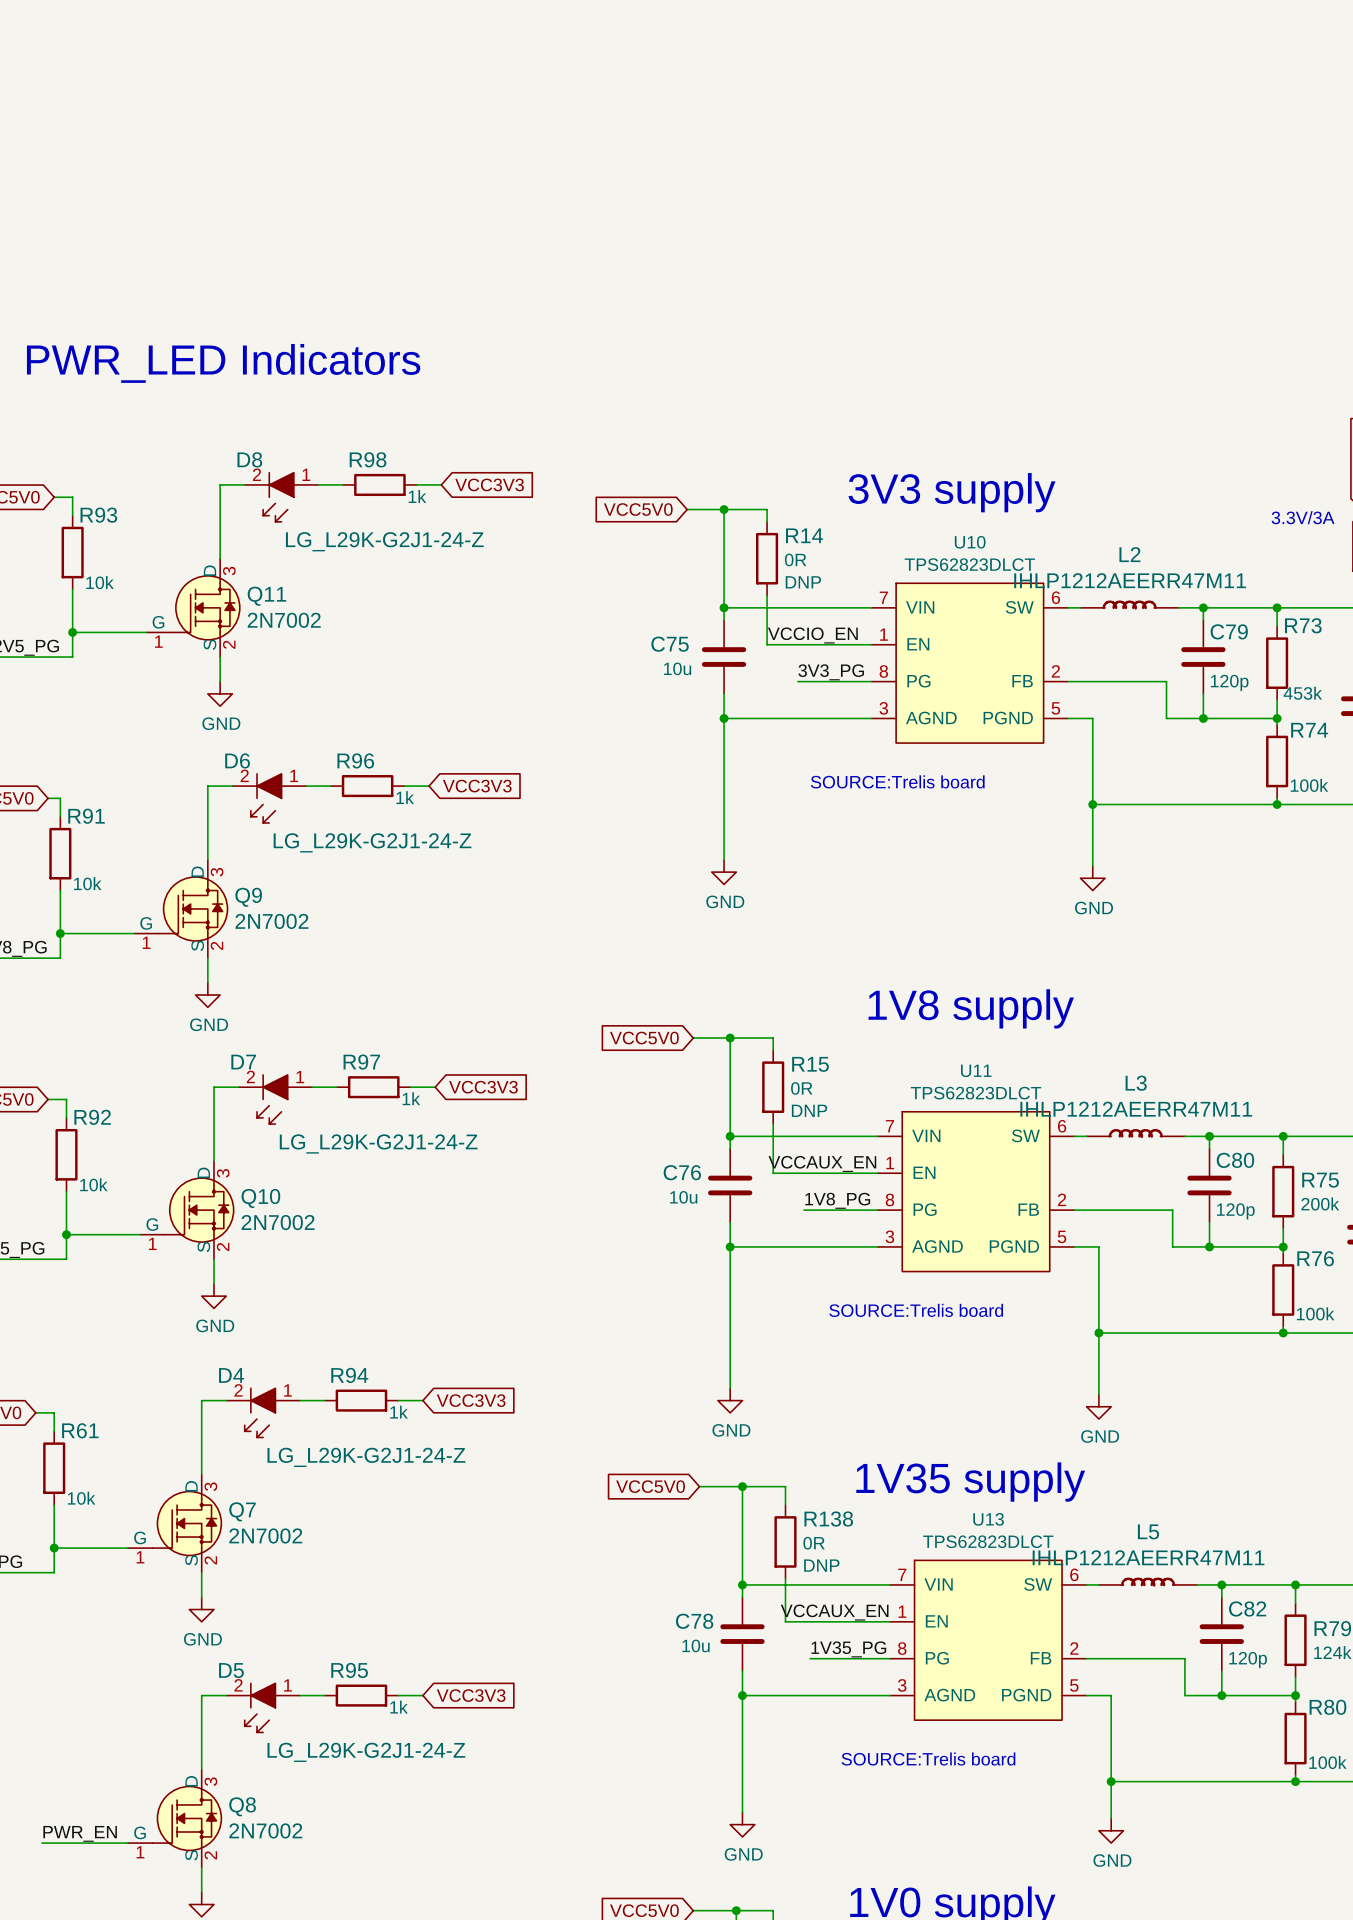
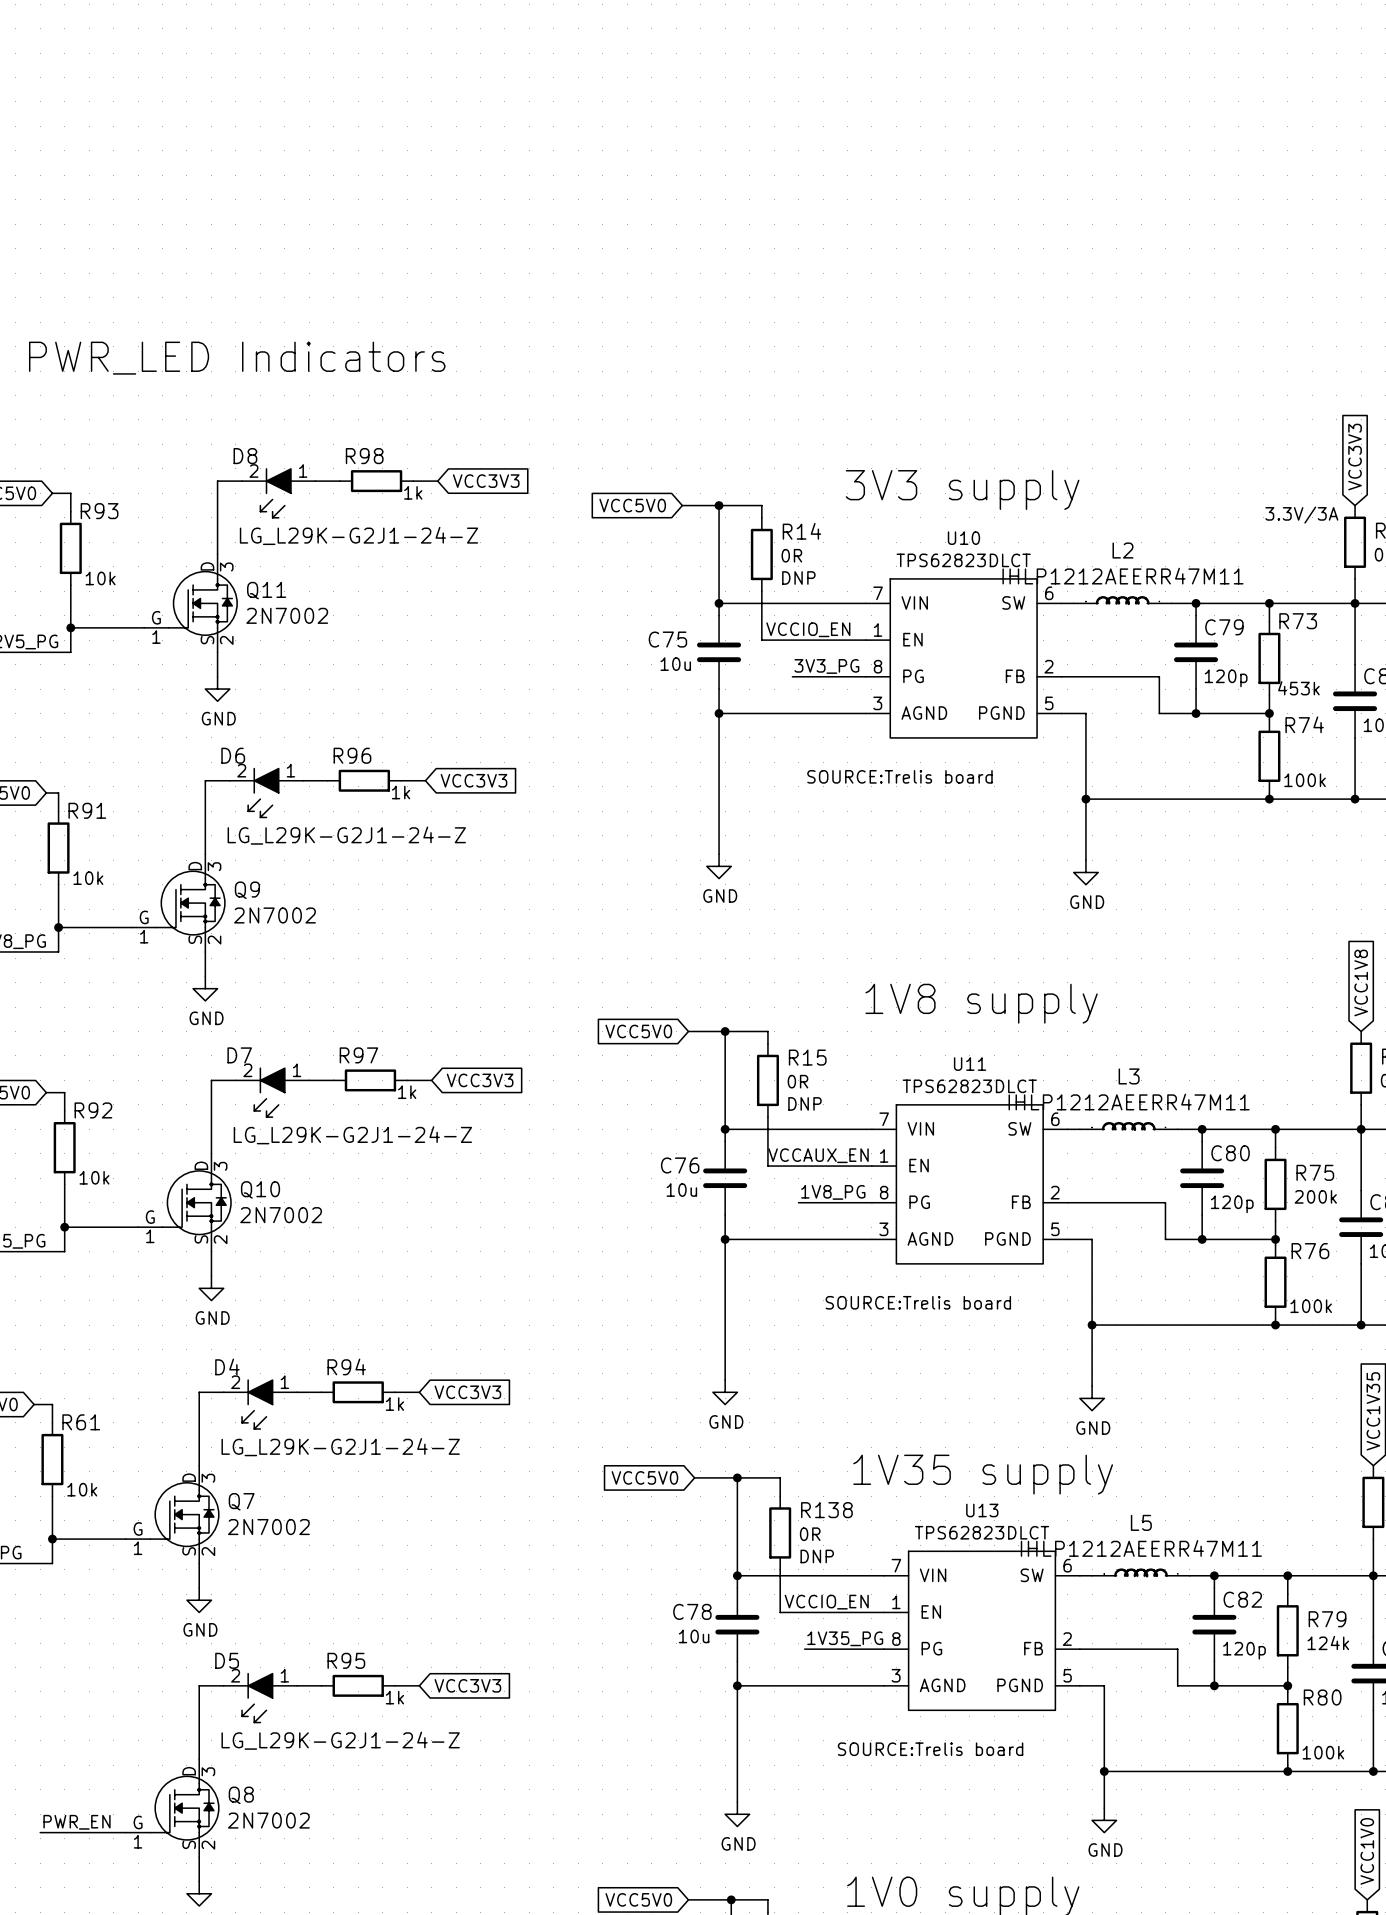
label: VCCAUX_EN (834, 1612) -> VCCIO_EN (826, 1602)

